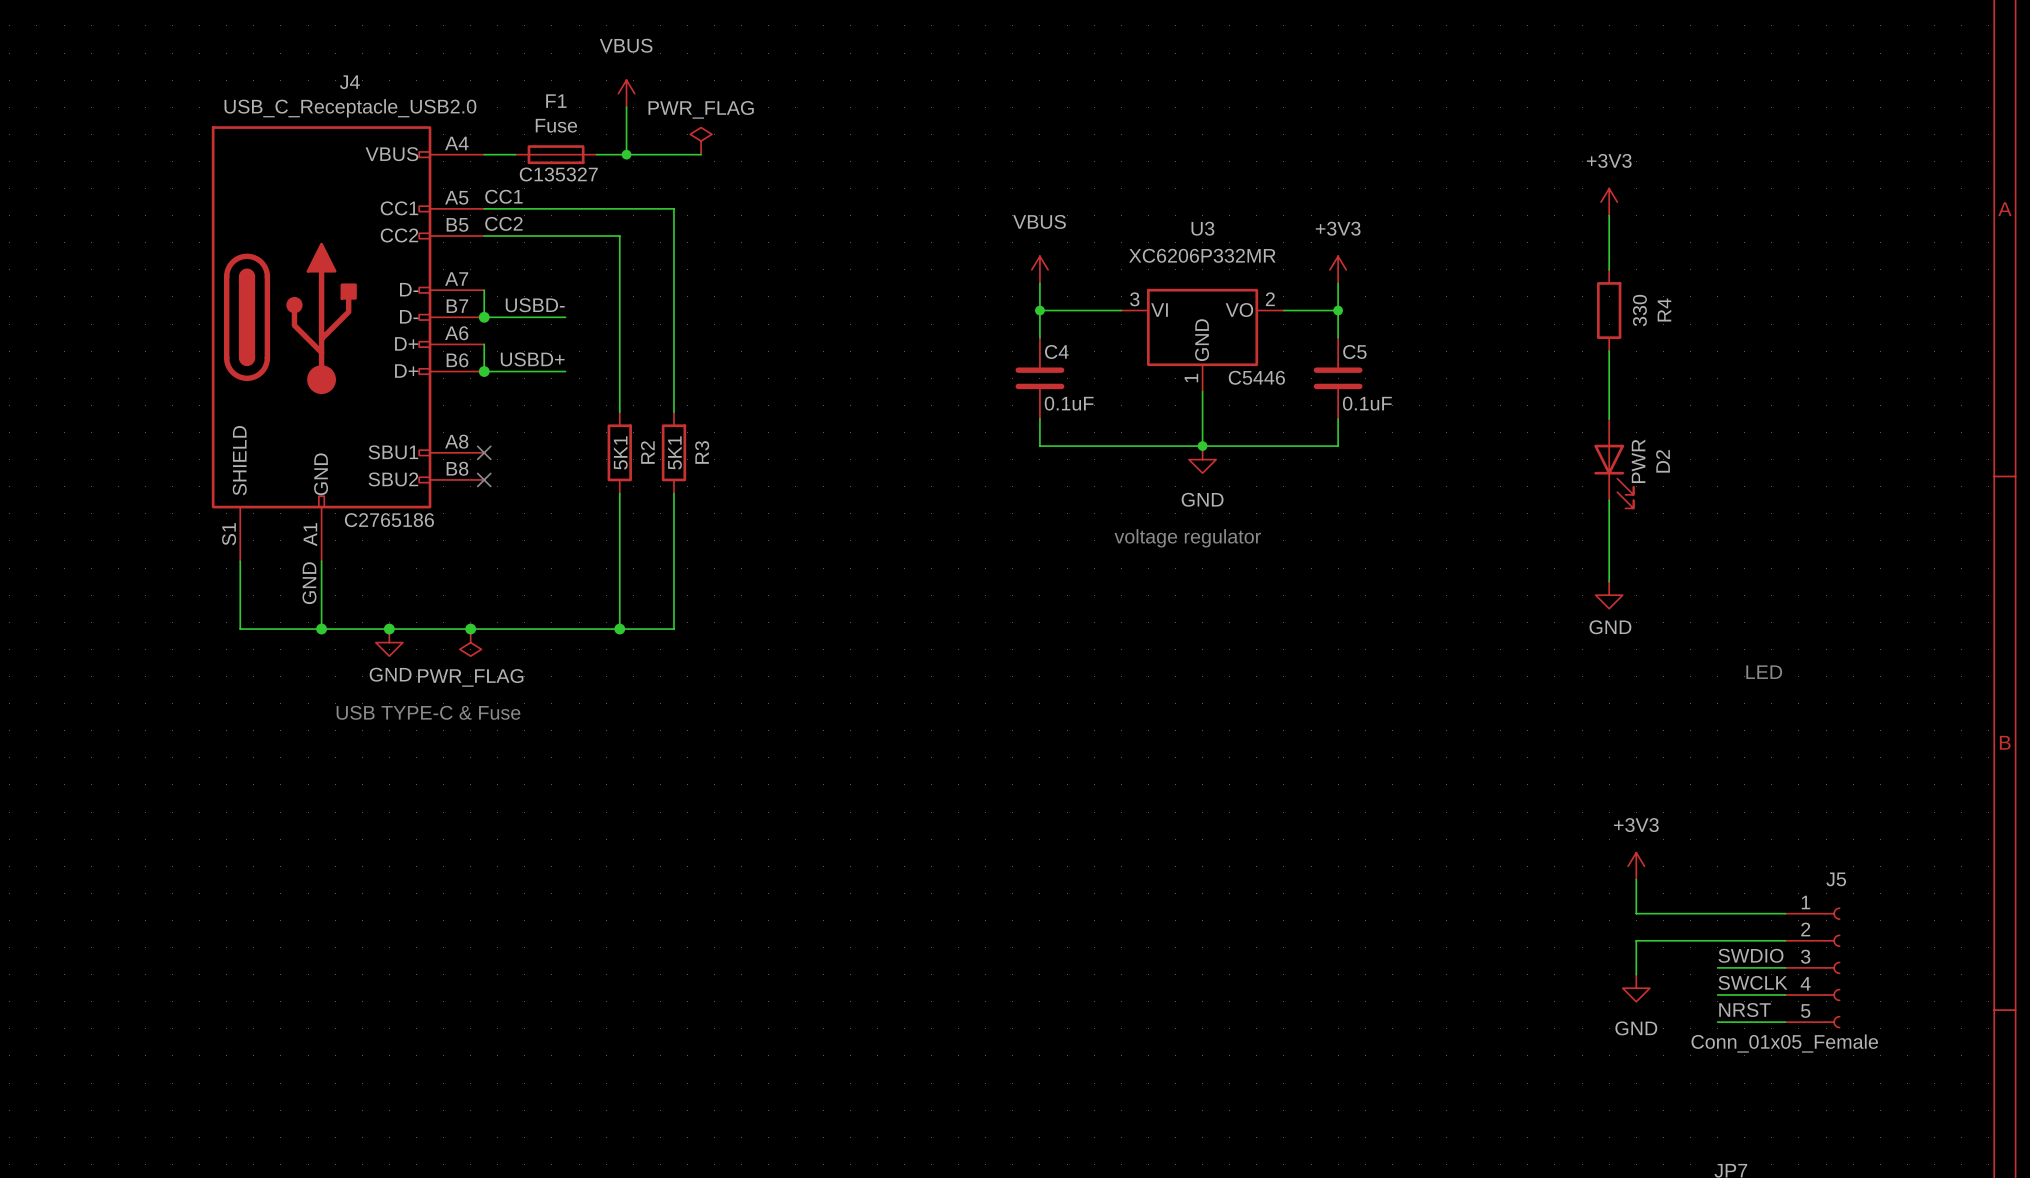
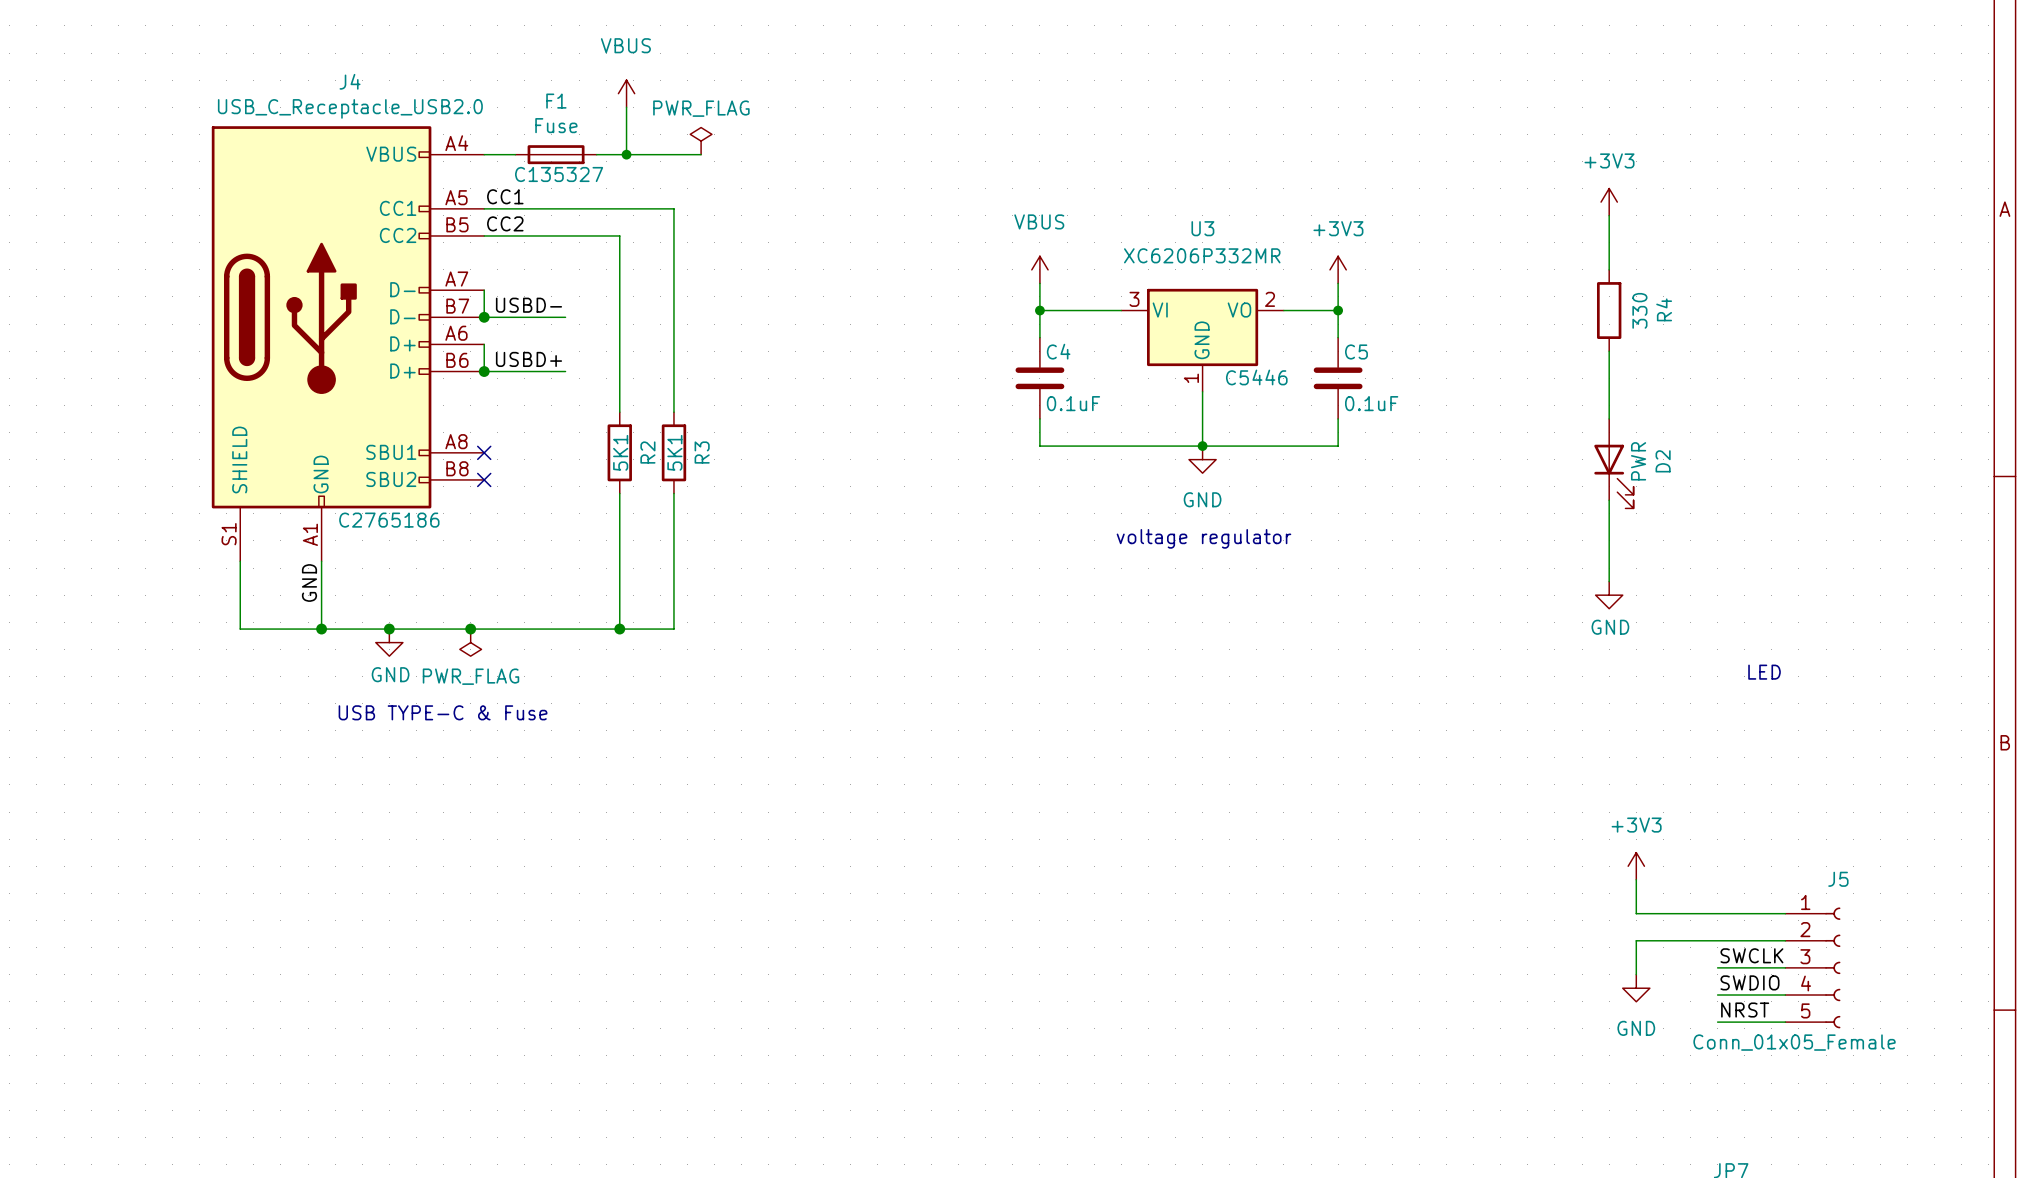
label: SWDIO (1750, 955) -> SWCLK (1751, 955)
label: SWCLK (1752, 982) -> SWDIO (1749, 982)

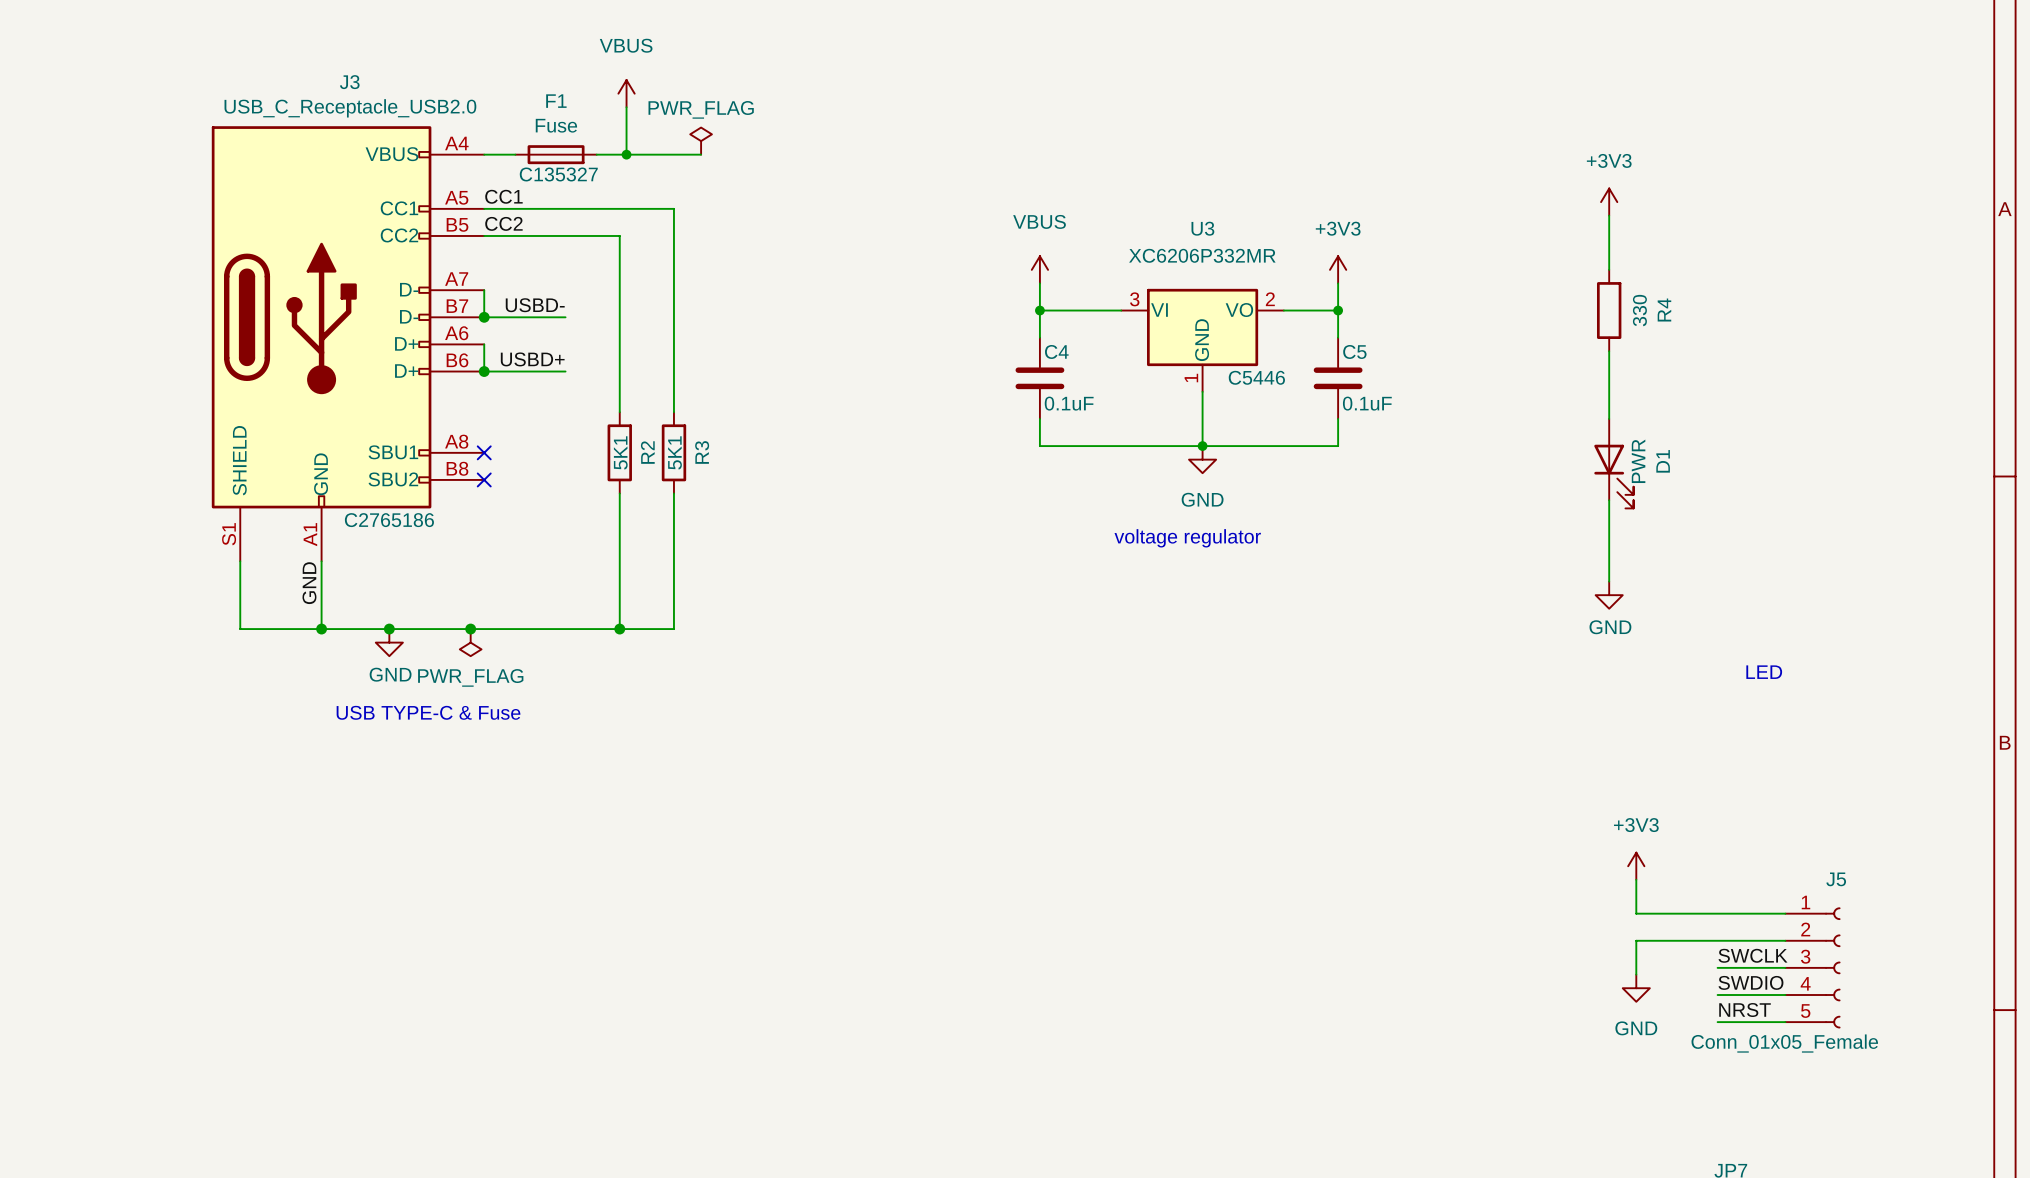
J4 name: J4 (350, 81) -> J3 (349, 82)
D2 name: D2 (1663, 461) -> D1 (1663, 461)

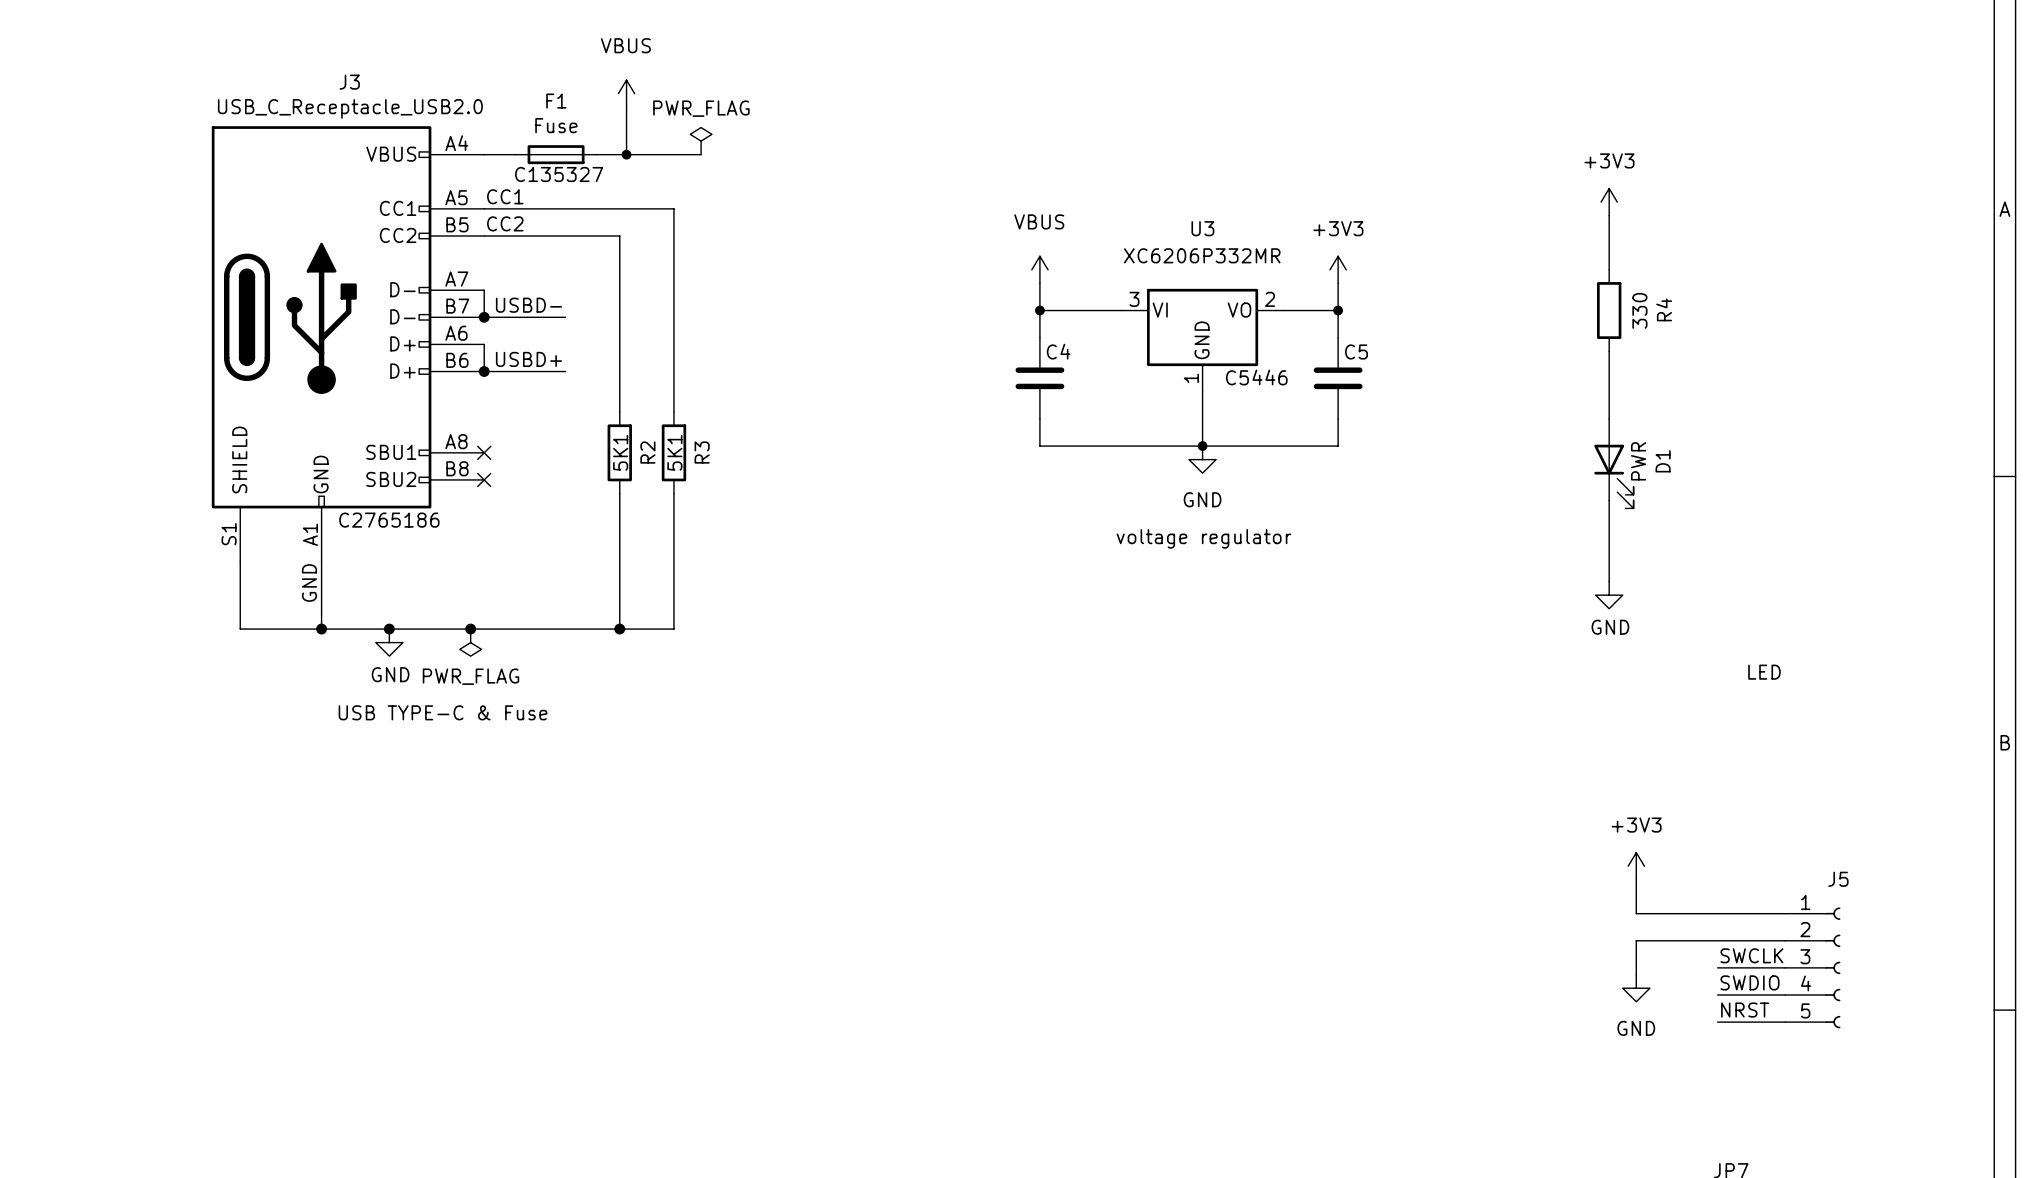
C4 value: 0.1uF (1069, 403) -> none
C5 value: 0.1uF (1367, 403) -> none
J5 value: Conn_01x05_Female (1784, 1043) -> none

